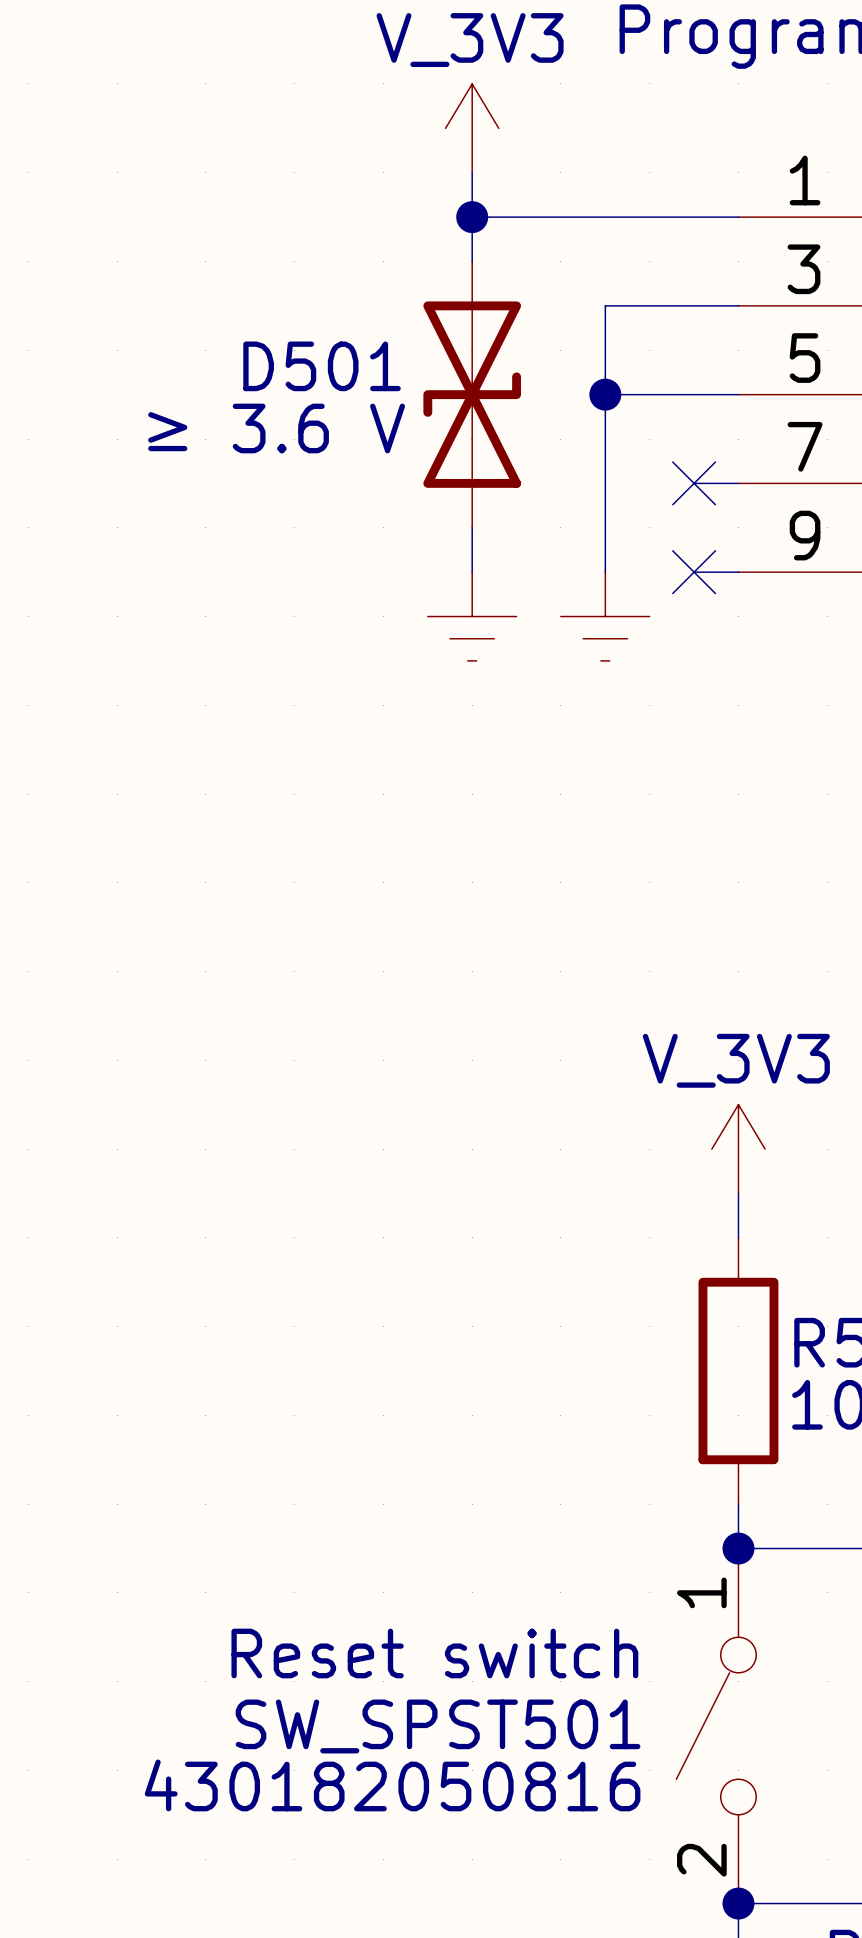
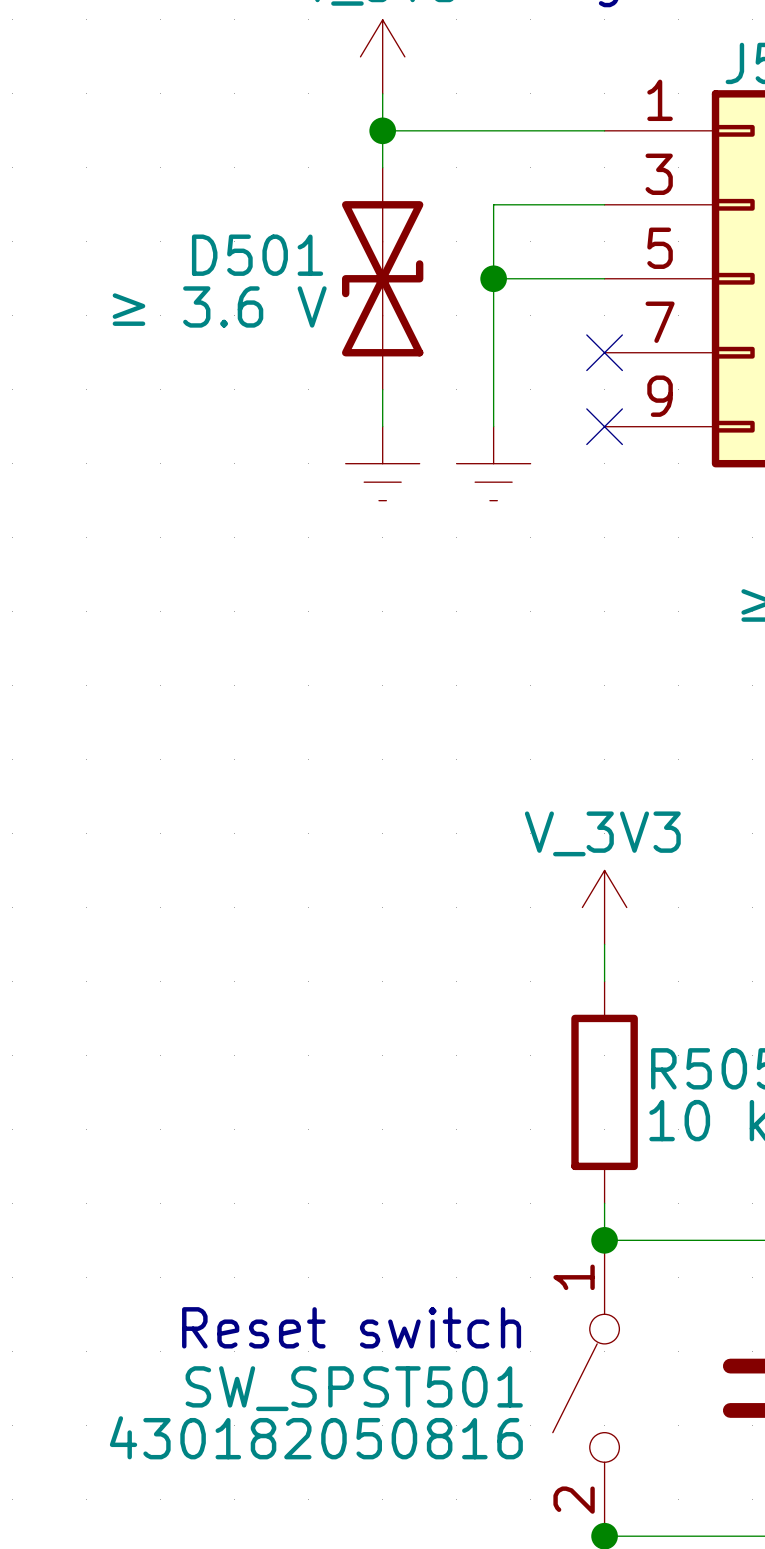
wire: (694, 483) (738, 483) -> none
no-connect mark position: (694, 483) -> (604, 352)
wire: (694, 572) (738, 572) -> none
no-connect mark position: (694, 572) -> (604, 426)

